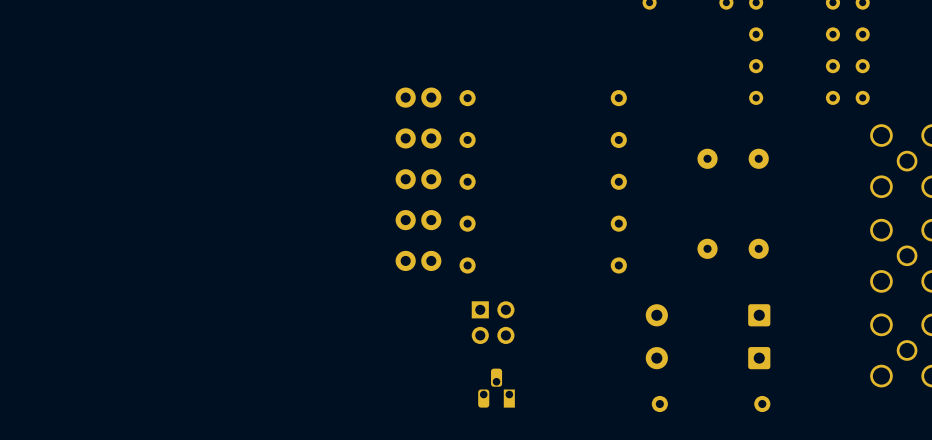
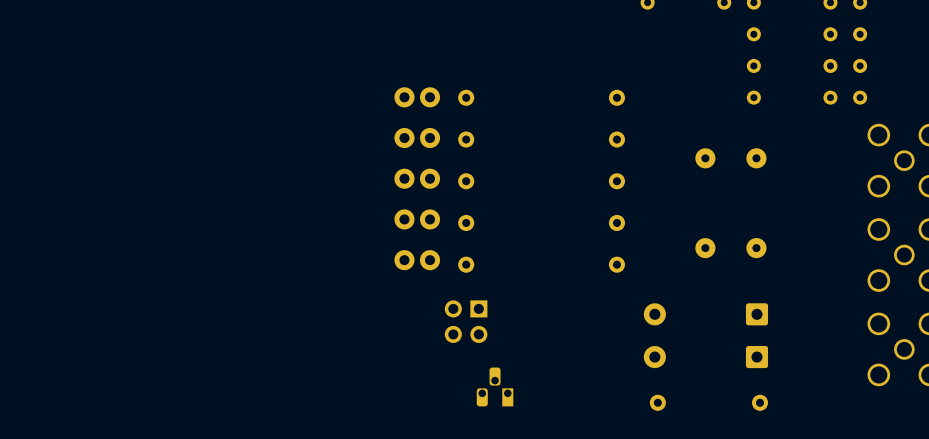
part rotation: 0° (493, 322) -> 90° clockwise (466, 321)

